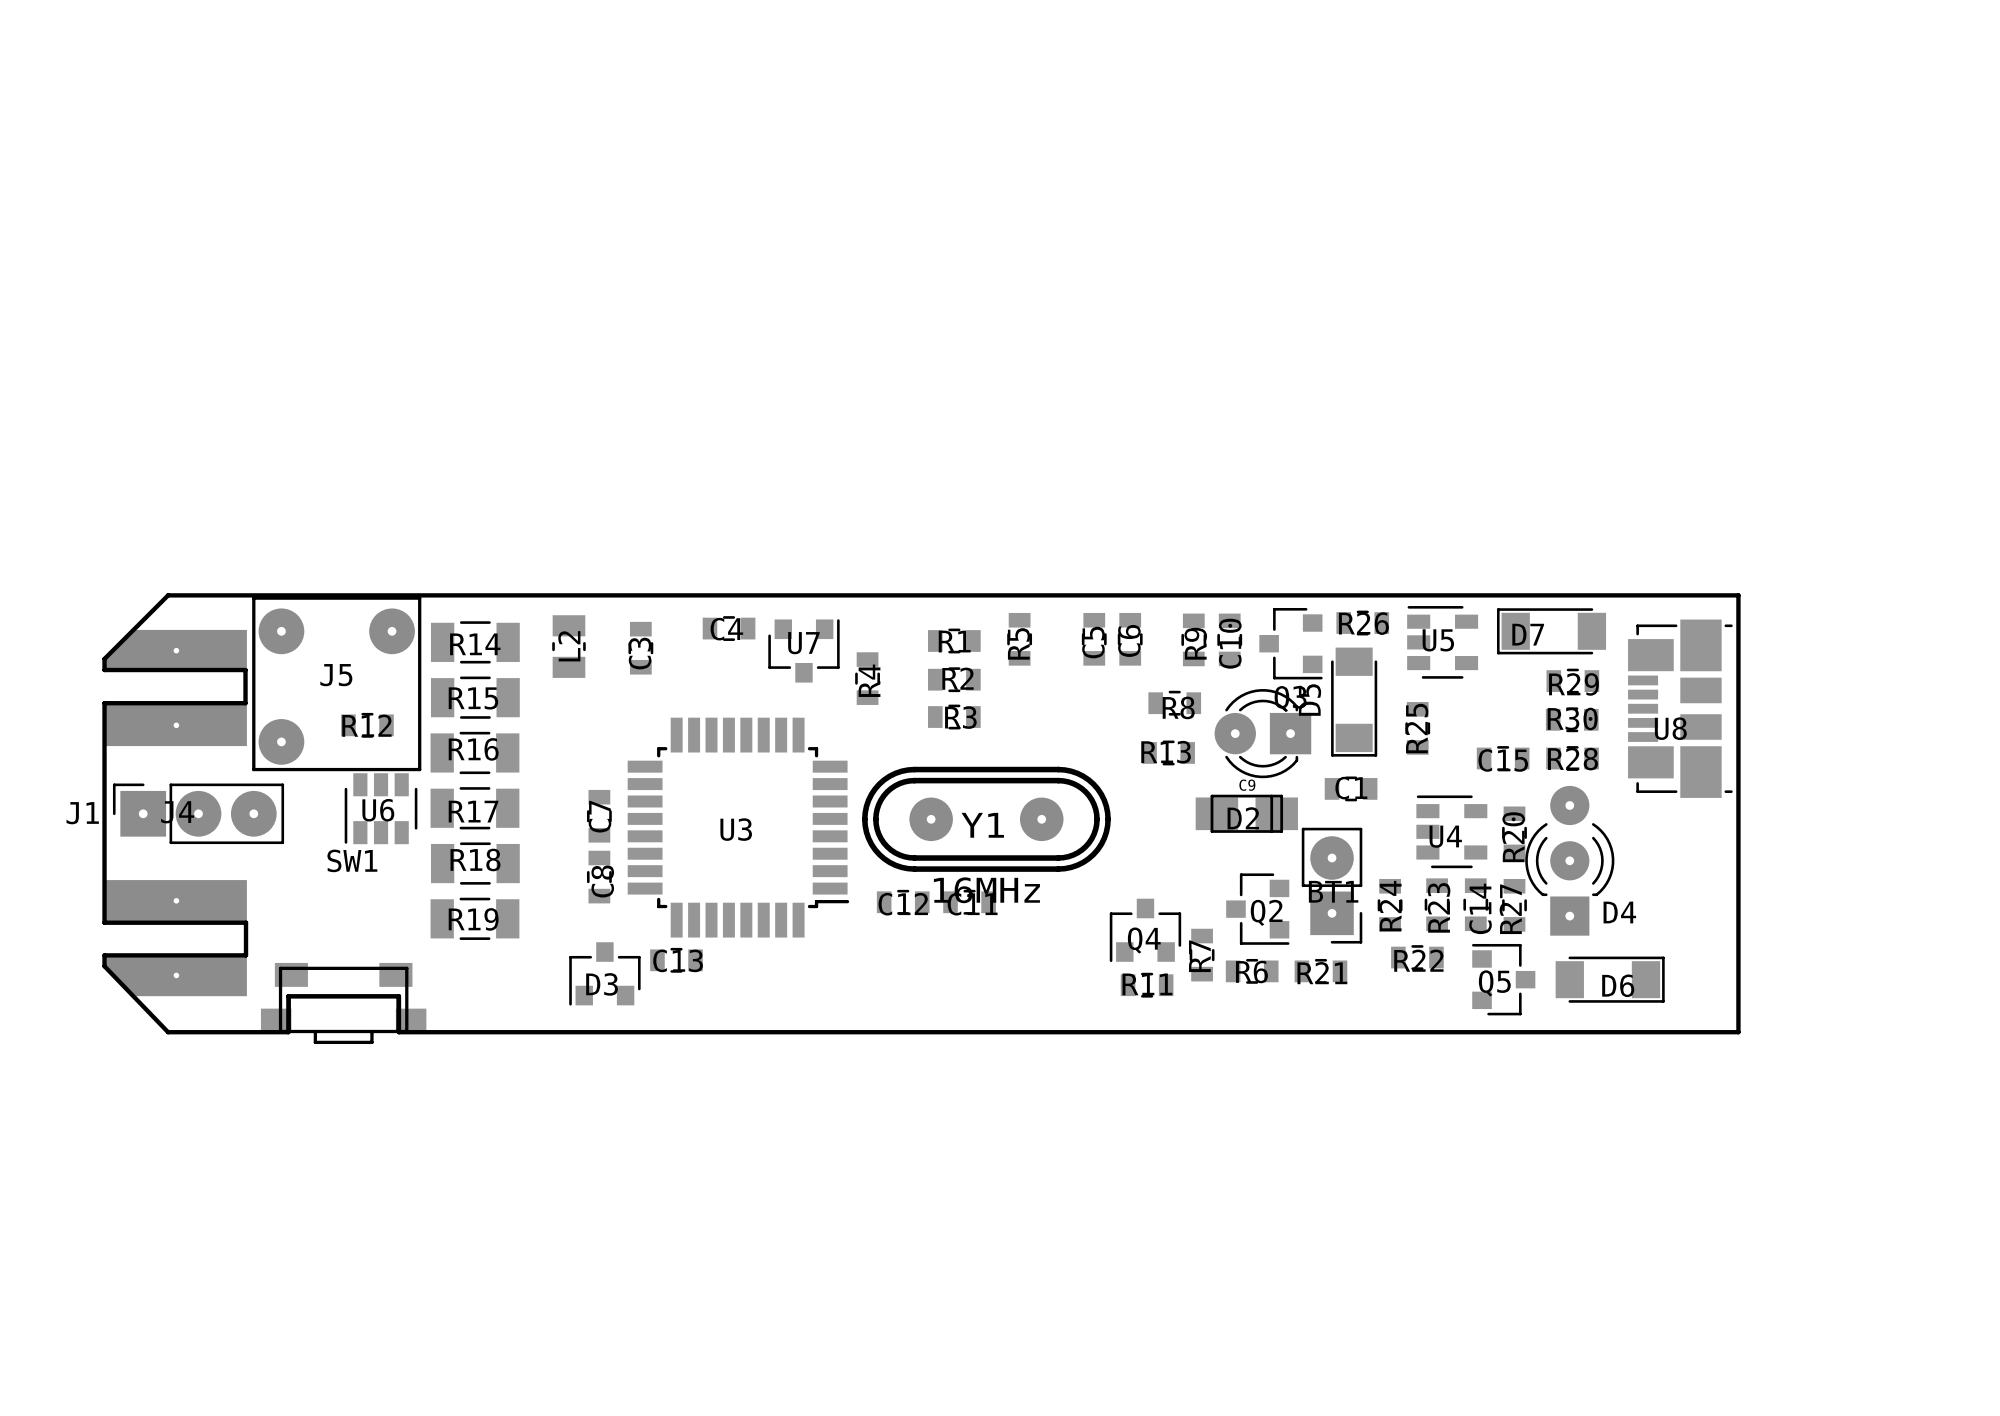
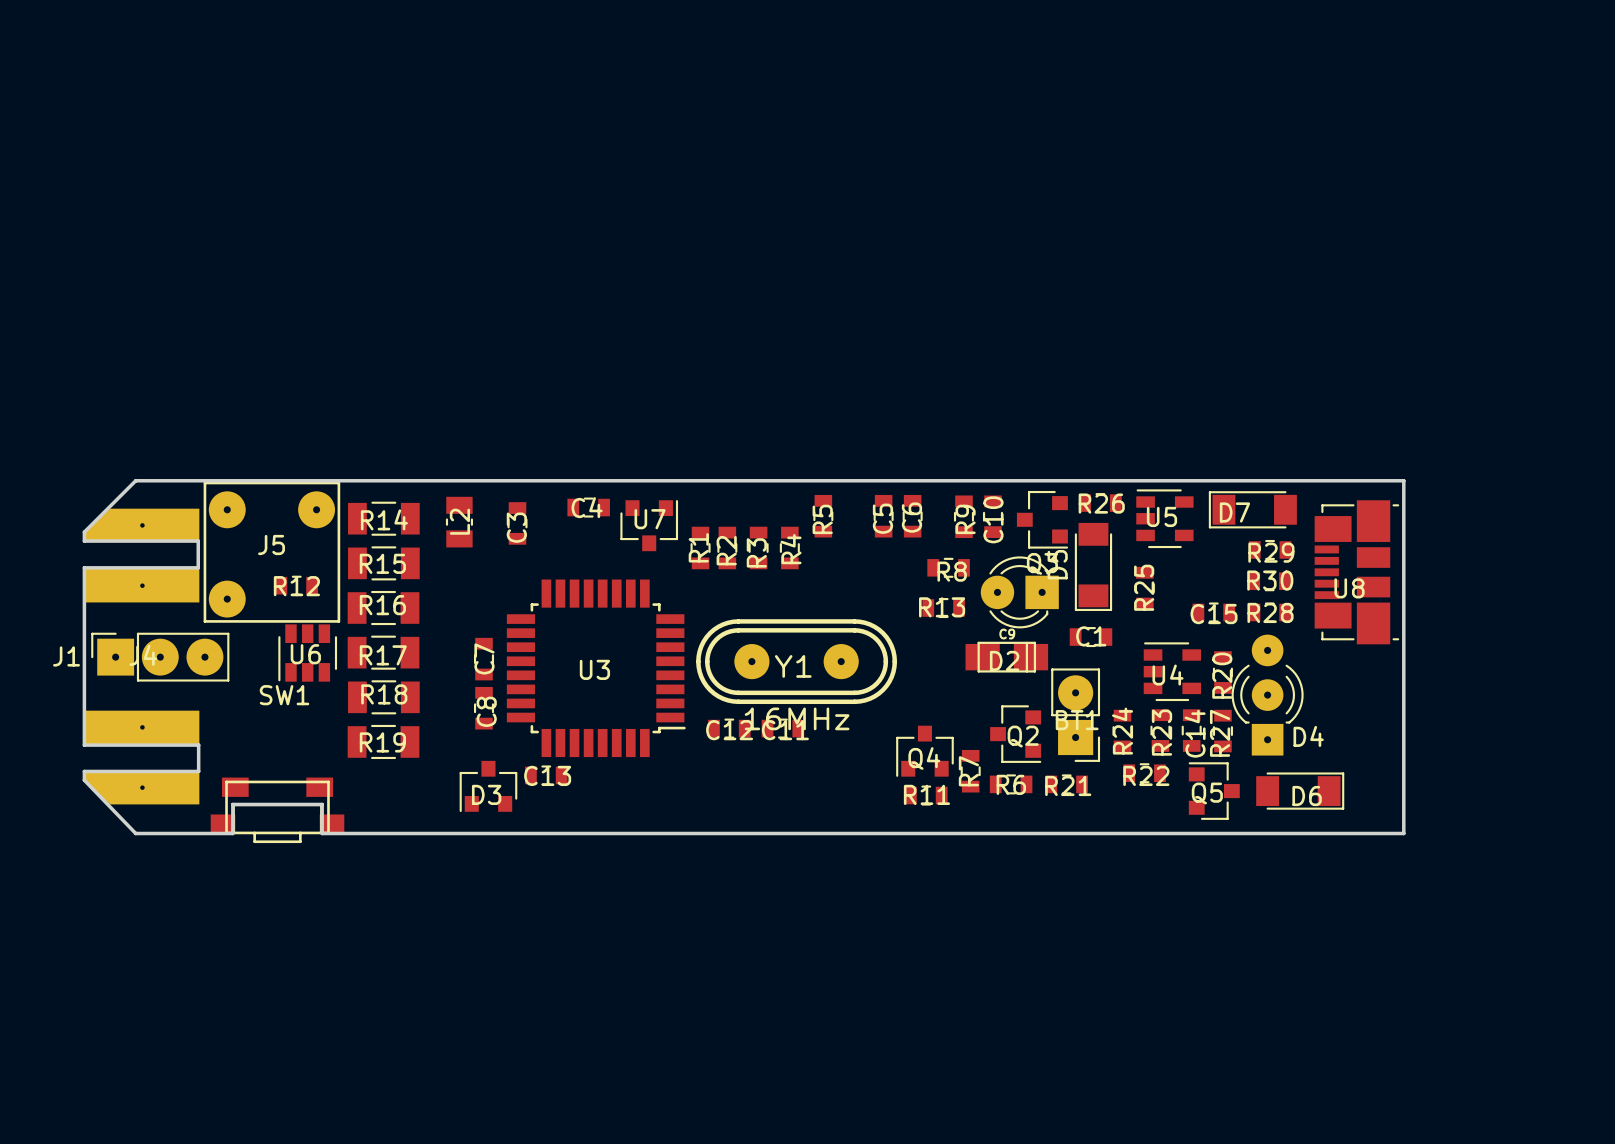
R1: (954, 640) -> none
R4: none -> (789, 547)
R2 rotation: 0° (954, 679) -> 90° clockwise (727, 547)
R2 position: (954, 679) -> (727, 547)
R4 name: R4 (869, 680) -> R1 (698, 547)
R3 rotation: 0° (954, 717) -> 90° clockwise (758, 547)
R3 position: (954, 717) -> (758, 547)

